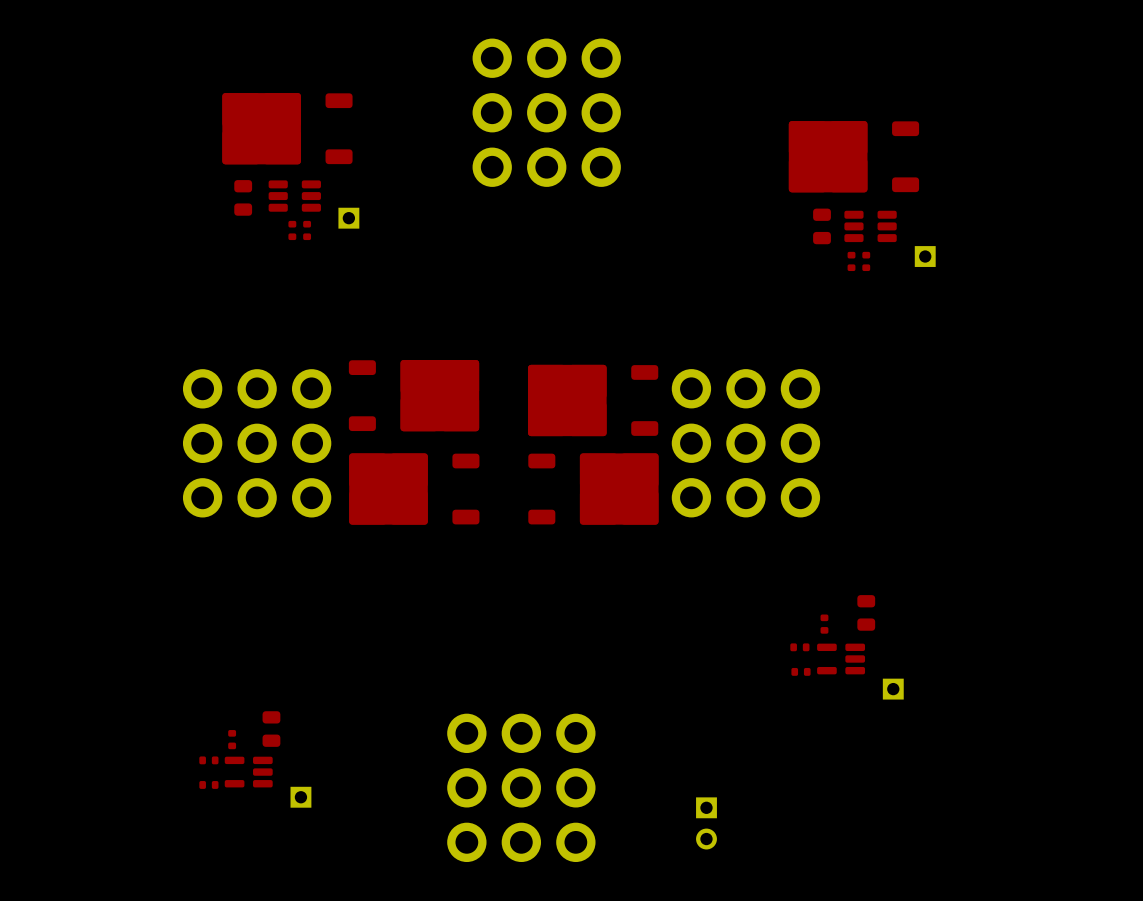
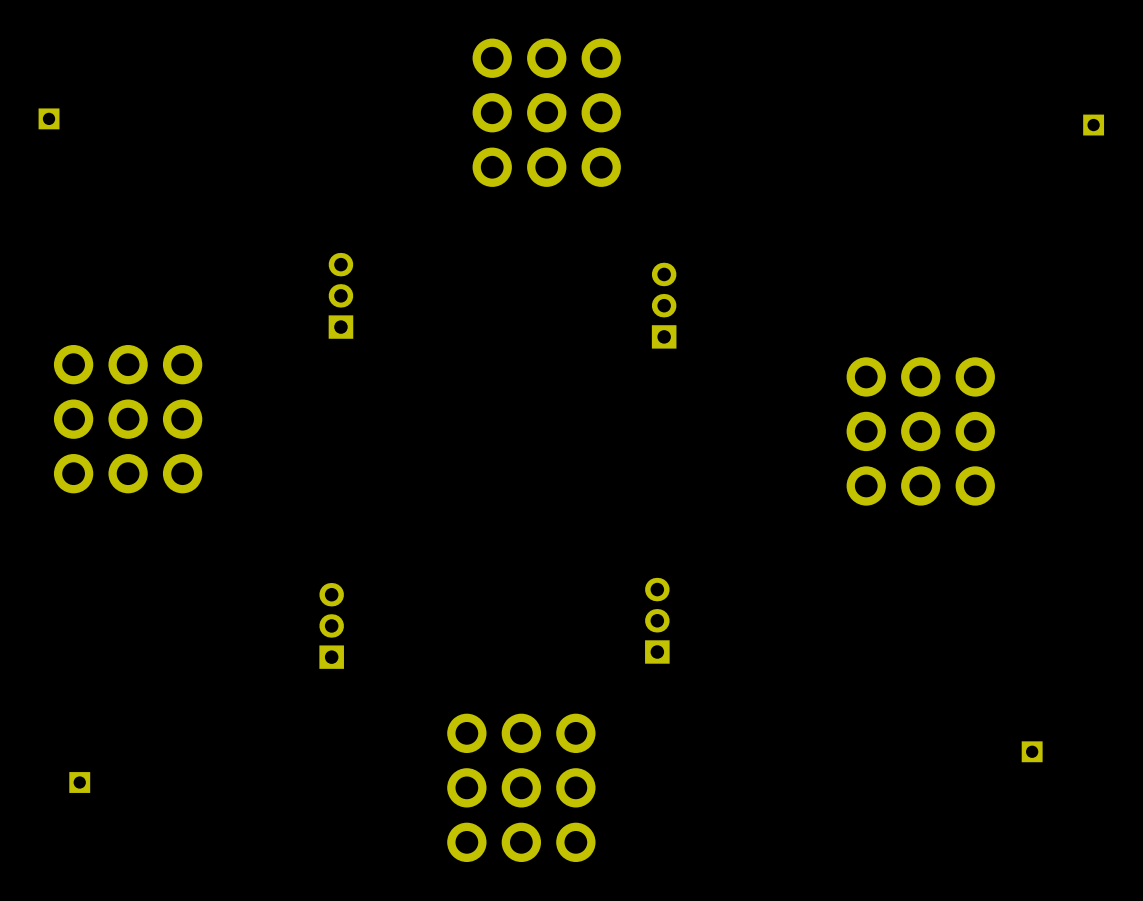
part: none -> (49, 118)
part: (287, 128) -> none
part: (853, 156) -> none
part: (294, 196) -> none
part: (243, 197) -> none
part: (348, 218) -> none
part: (822, 226) -> none
part: (870, 226) -> none
part: (292, 230) -> none
part: (307, 230) -> none
part position: (925, 256) -> (1093, 125)
part: (851, 261) -> none
part: (866, 261) -> none
part: none -> (340, 295)
part: none -> (664, 305)
part: (414, 395) -> none
part: (593, 400) -> none
part position: (257, 443) -> (128, 419)
part position: (745, 443) -> (920, 431)
part: (414, 489) -> none
part: (593, 489) -> none
part: (866, 612) -> none
part: none -> (657, 620)
part: (824, 624) -> none
part: none -> (331, 625)
part: (799, 647) -> none
part: (841, 658) -> none
part: (801, 671) -> none
part position: (893, 689) -> (1032, 751)
part: (271, 729) -> none
part: (232, 739) -> none
part: (208, 760) -> none
part: (248, 772) -> none
part: (208, 784) -> none
part position: (300, 797) -> (79, 782)
part: (706, 823) -> none

